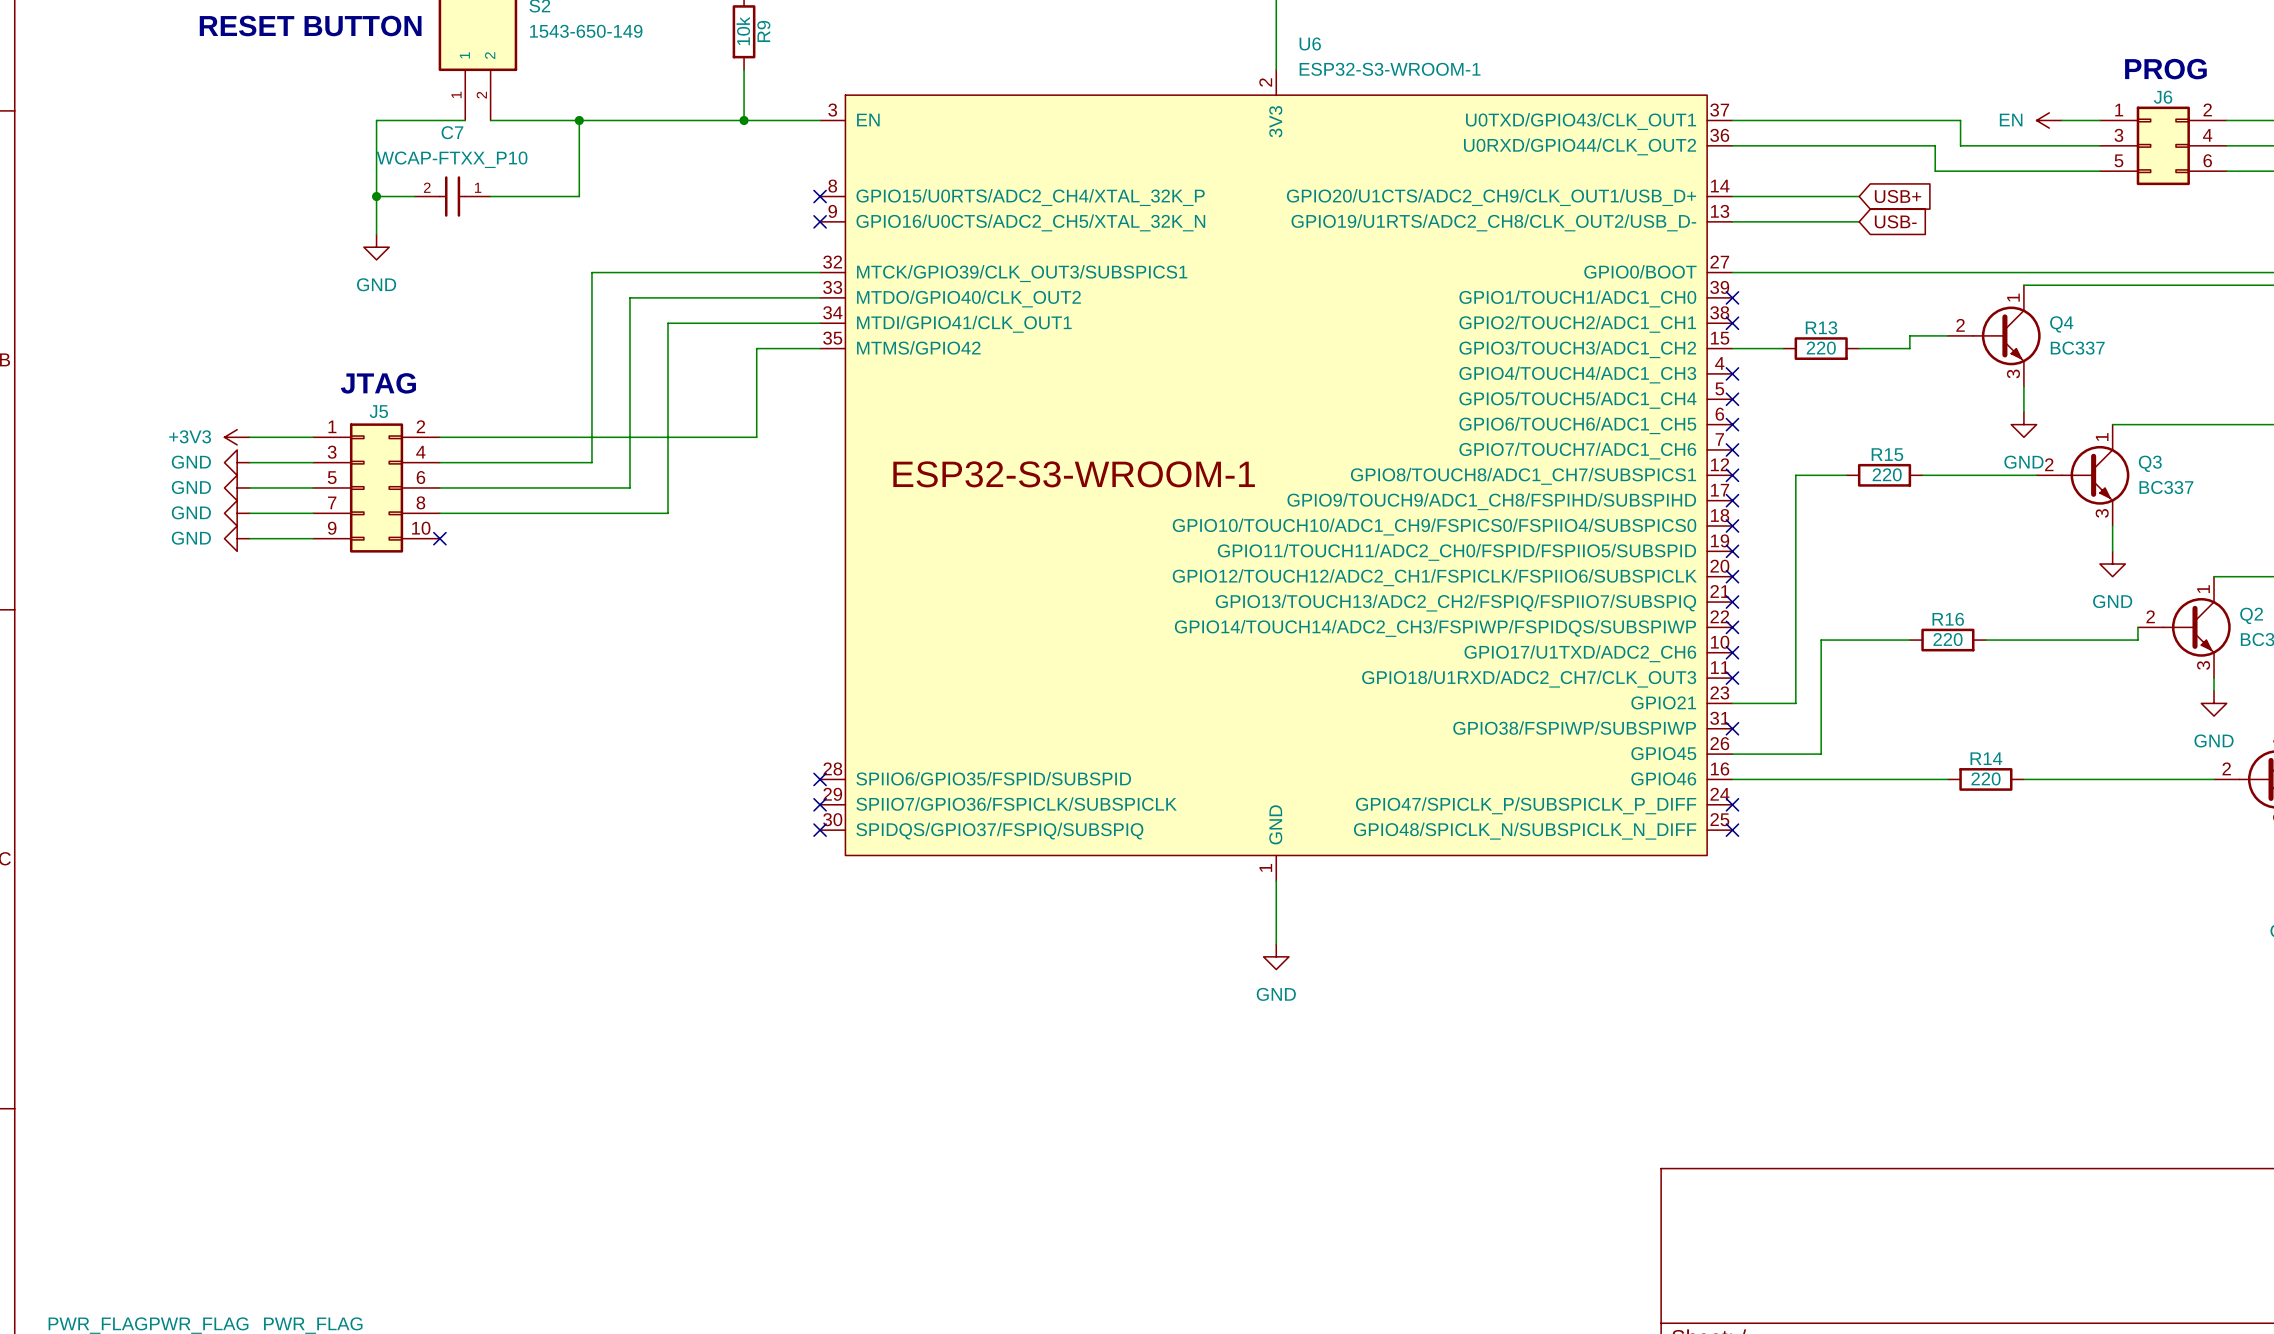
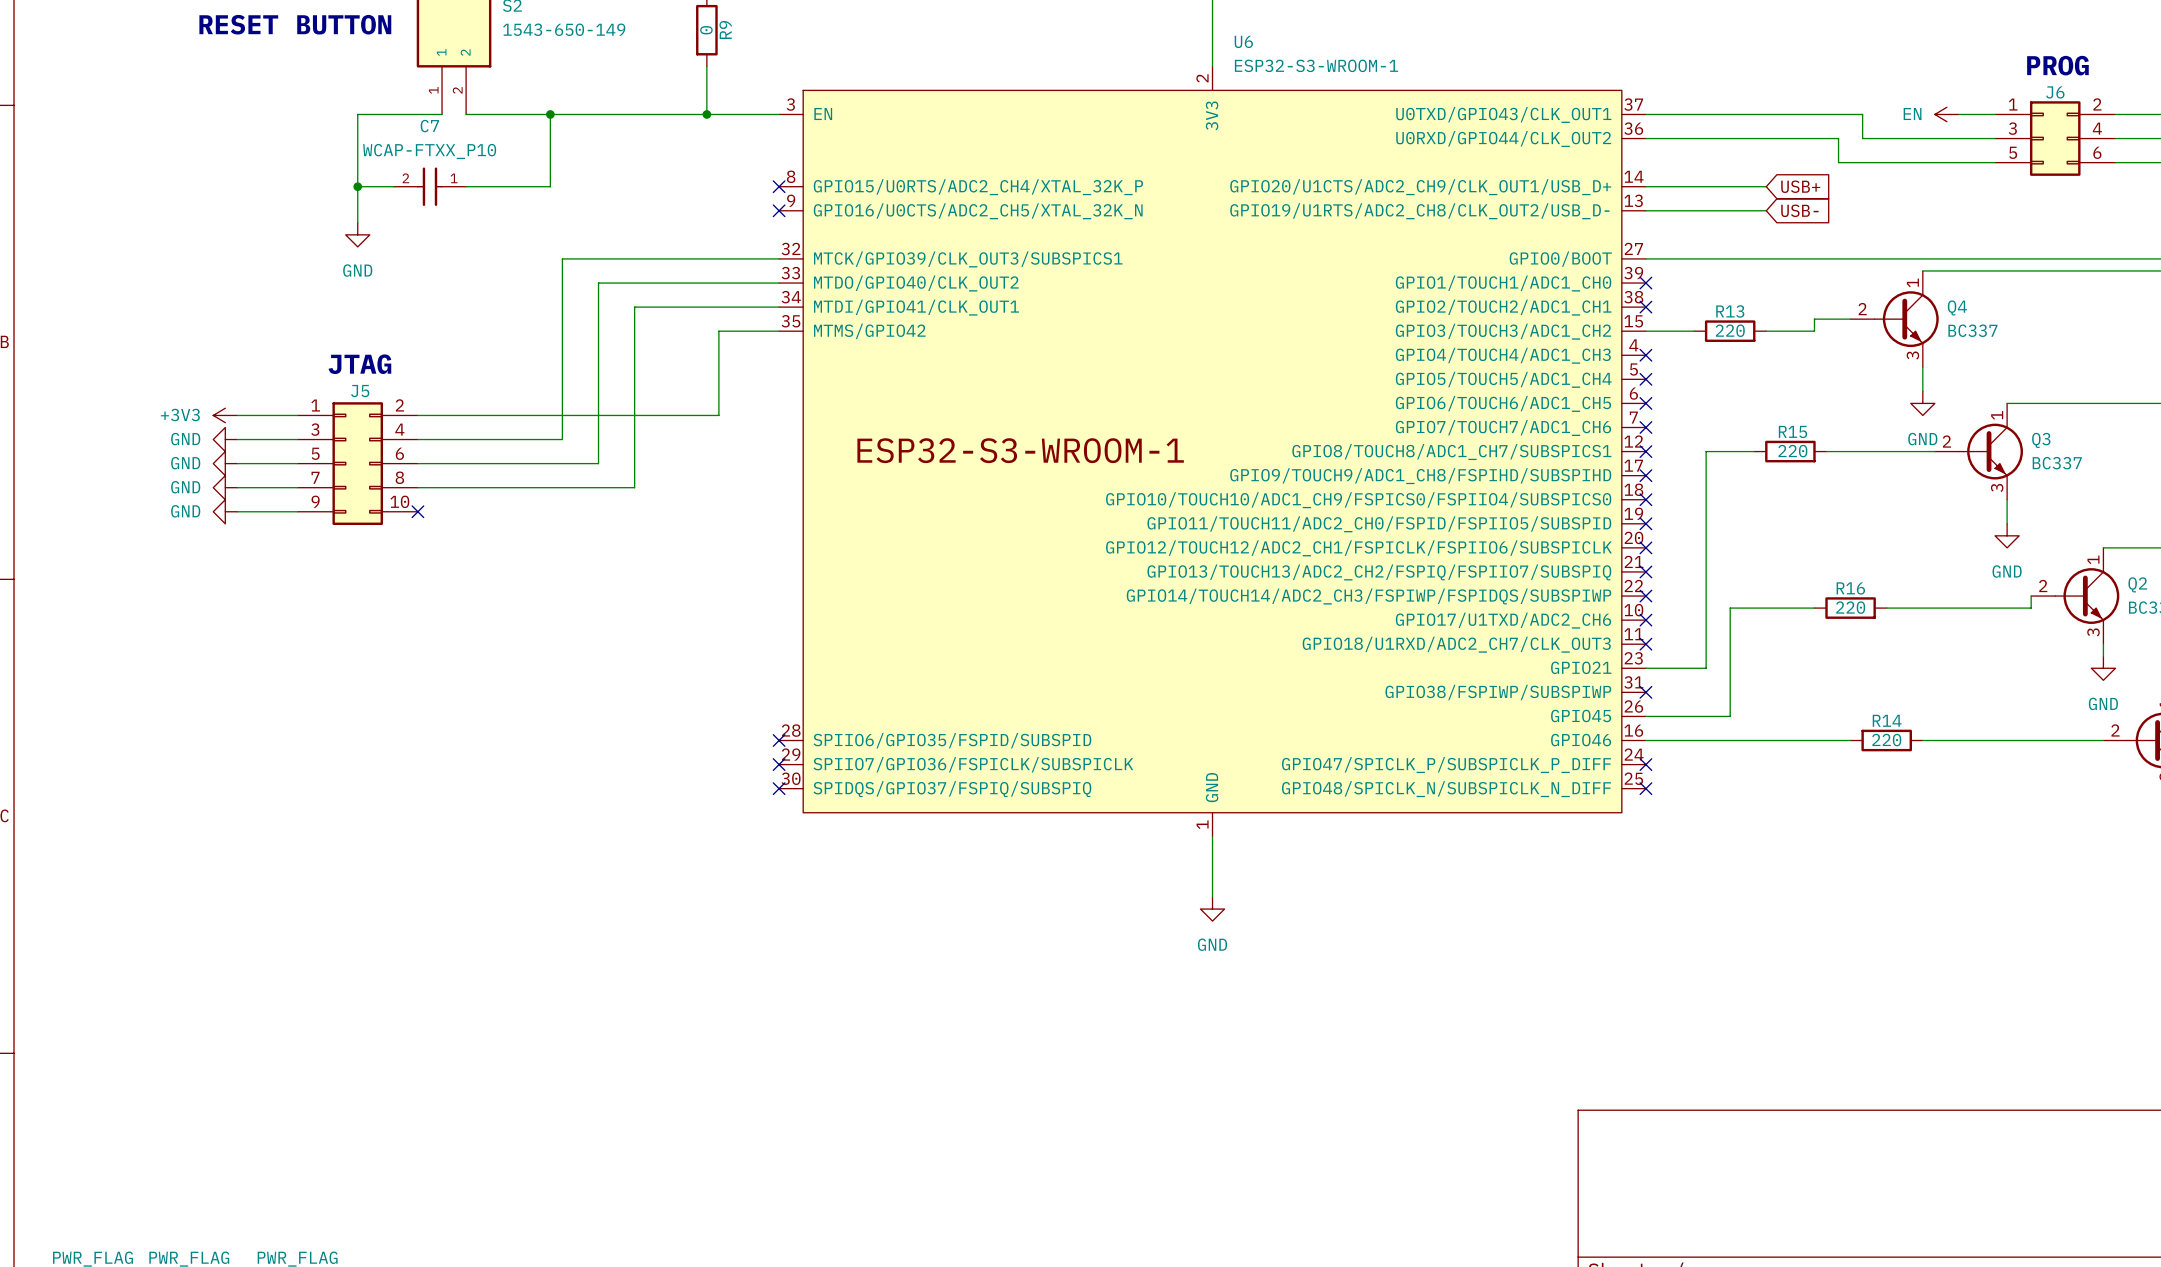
R9 value: 10k (743, 31) -> 0 (706, 30)

